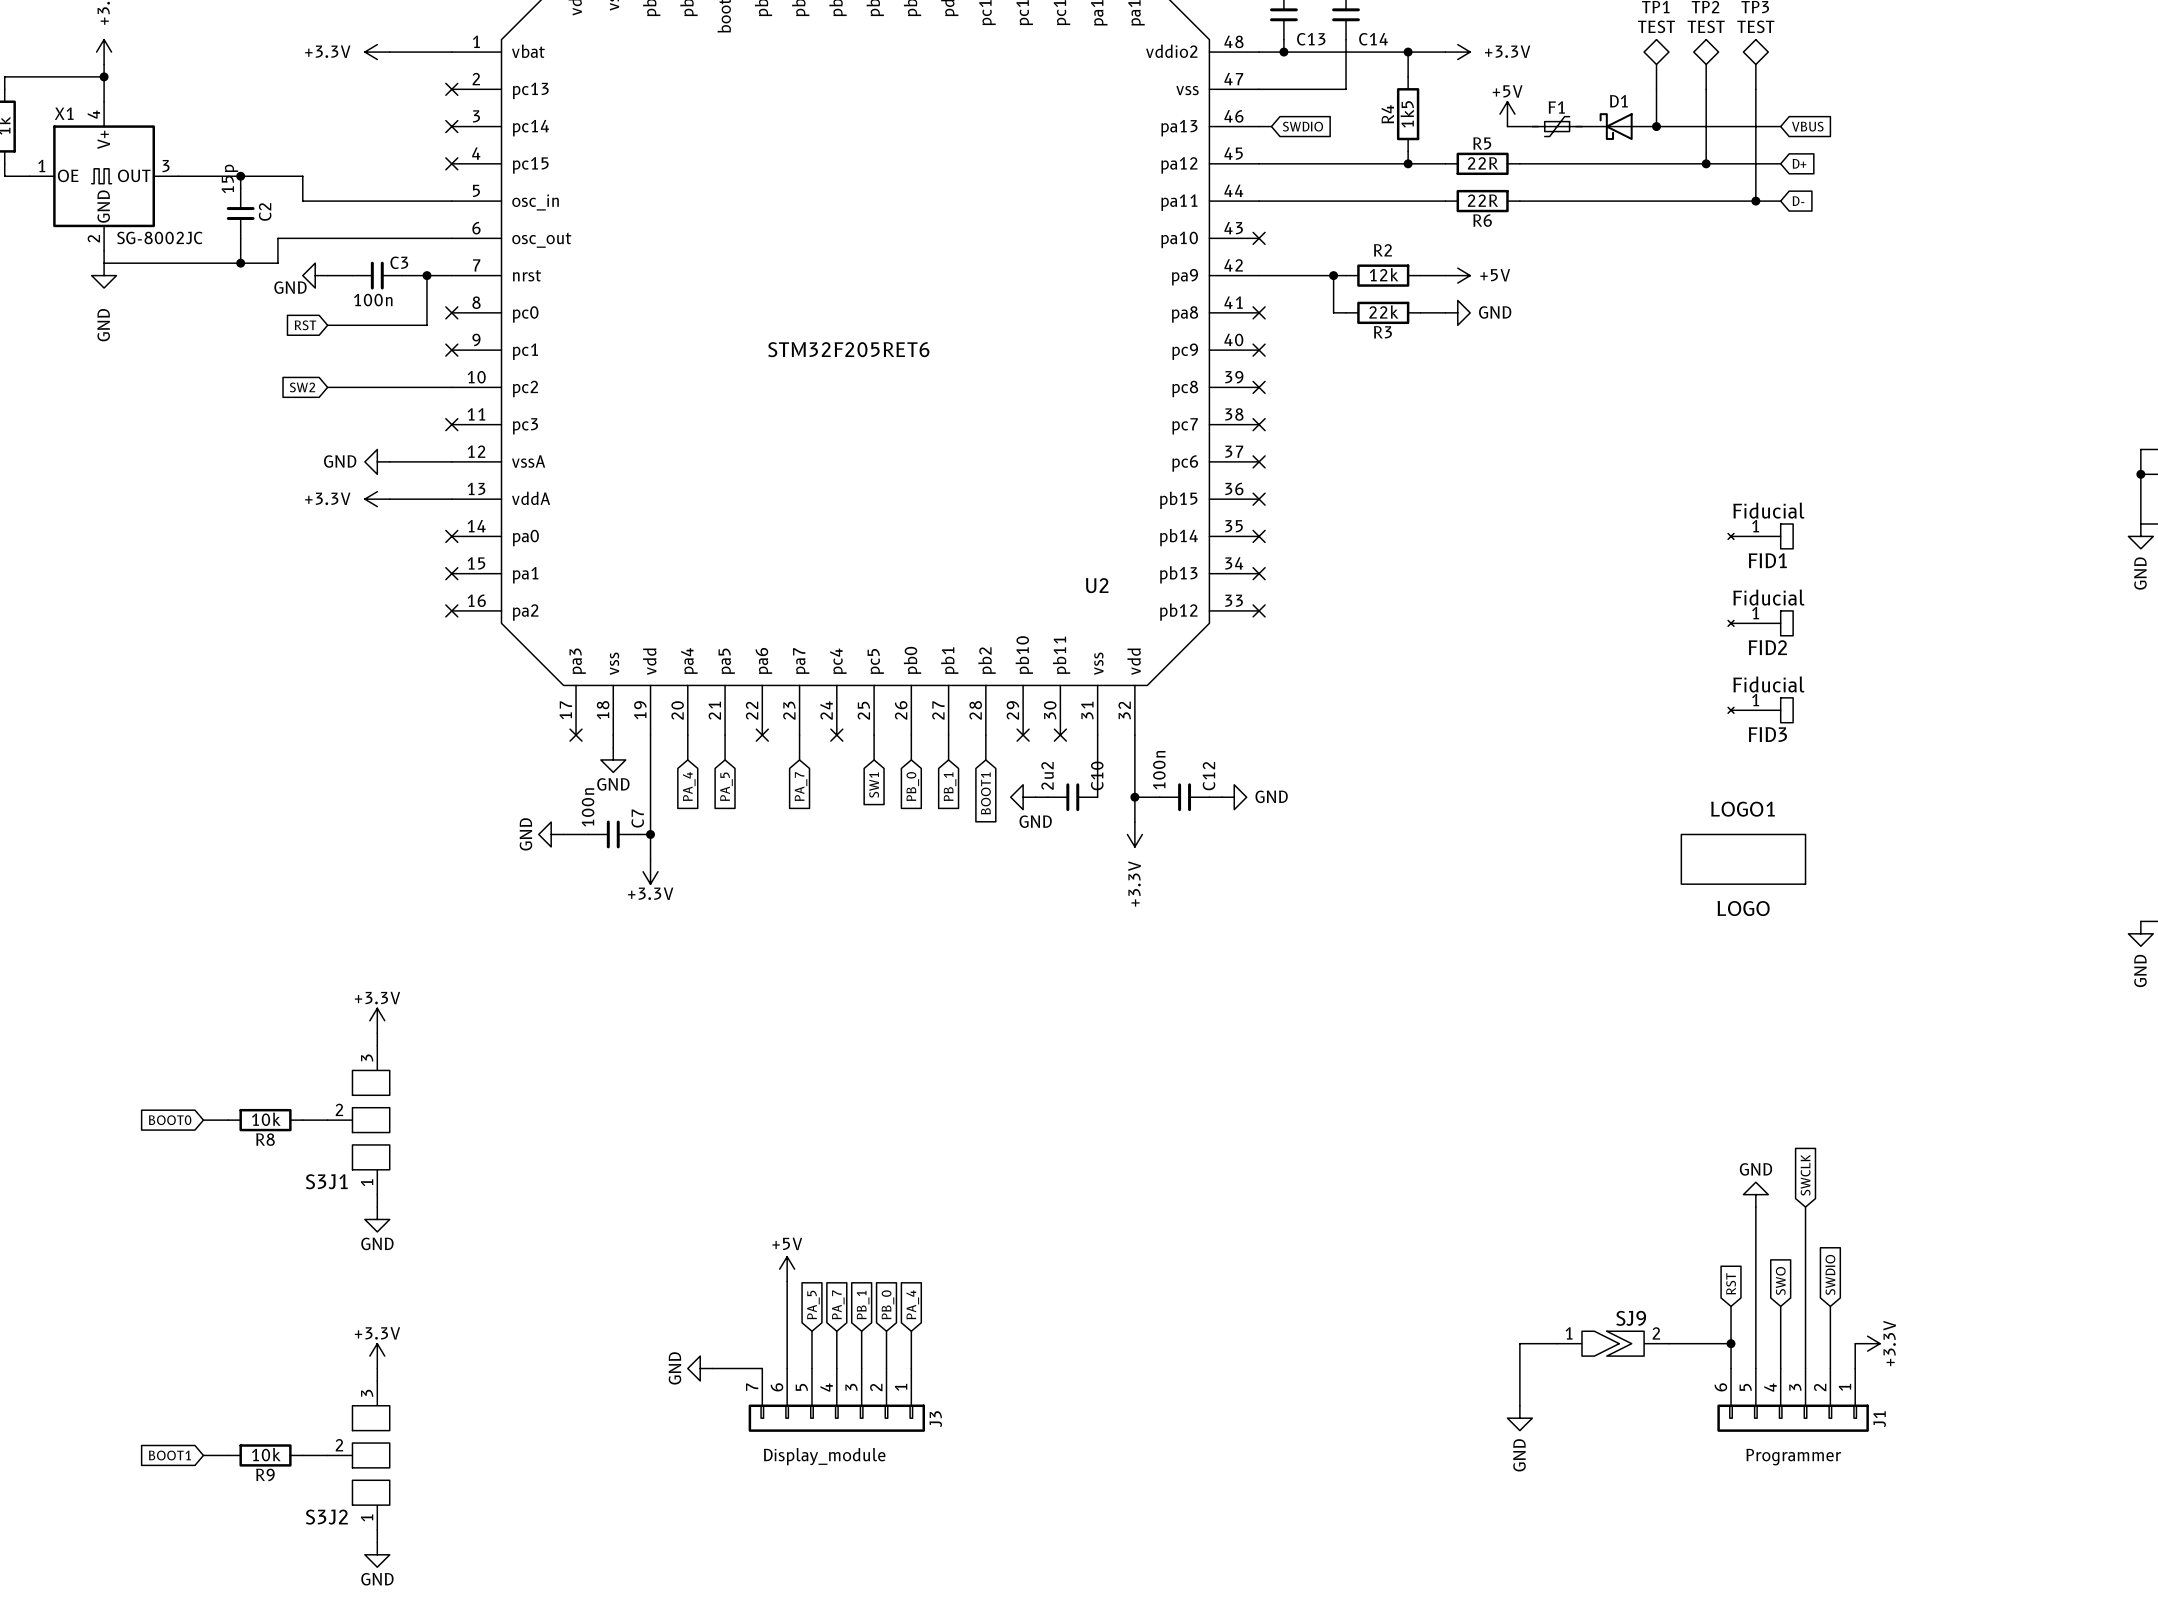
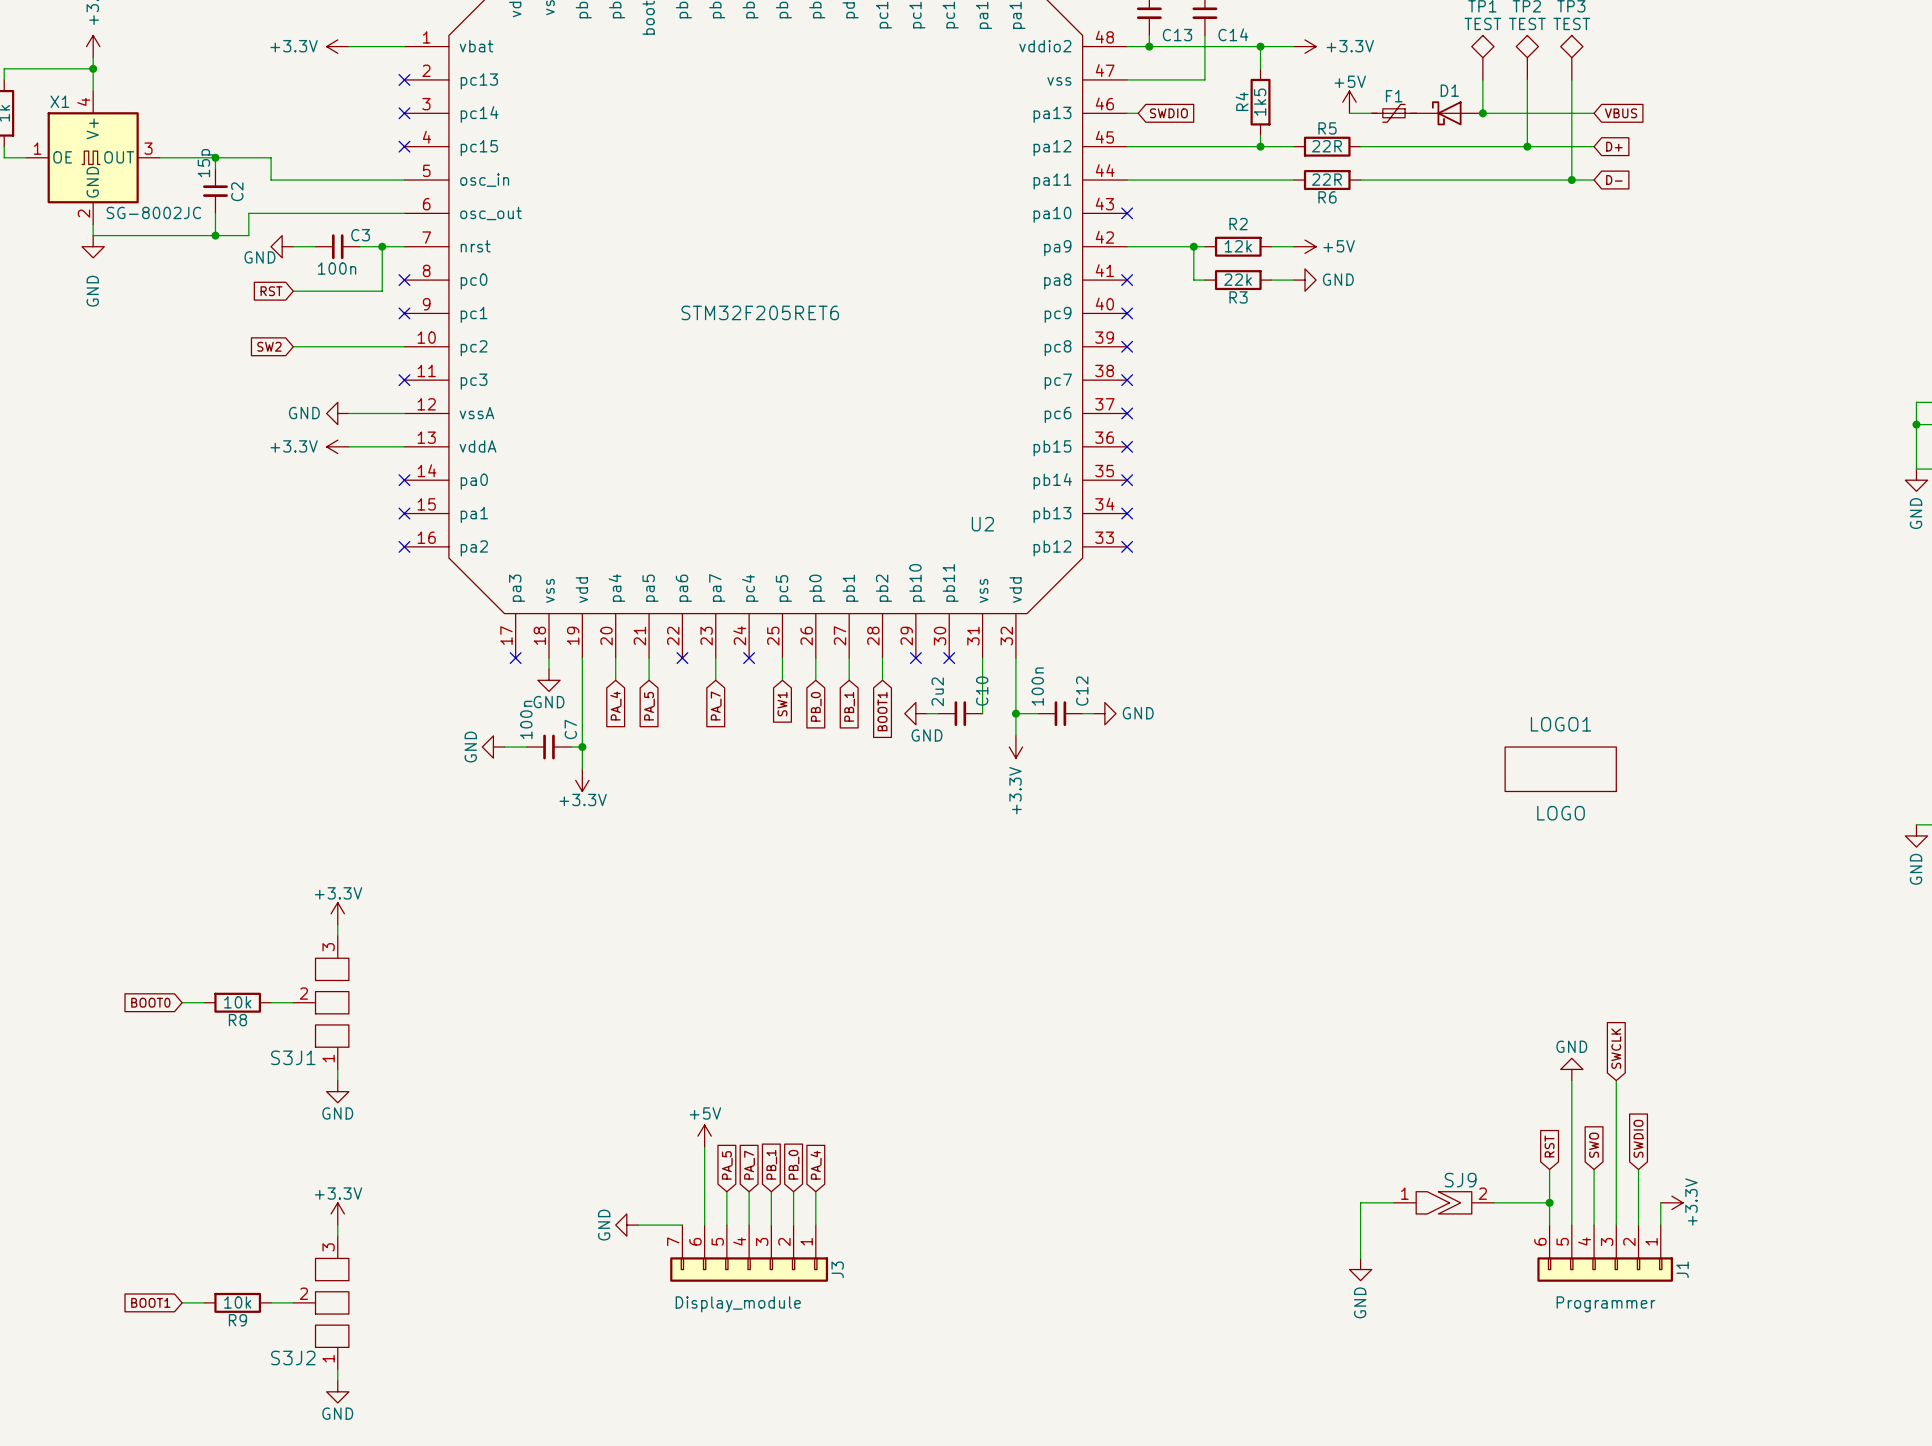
FID1: Fiducial (1760, 536) -> none
FID2: Fiducial (1760, 623) -> none
FID3: Fiducial (1760, 710) -> none

